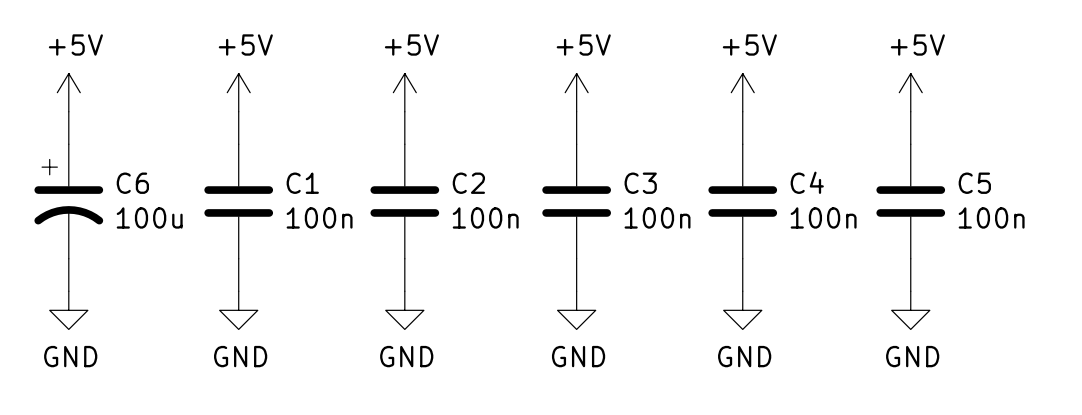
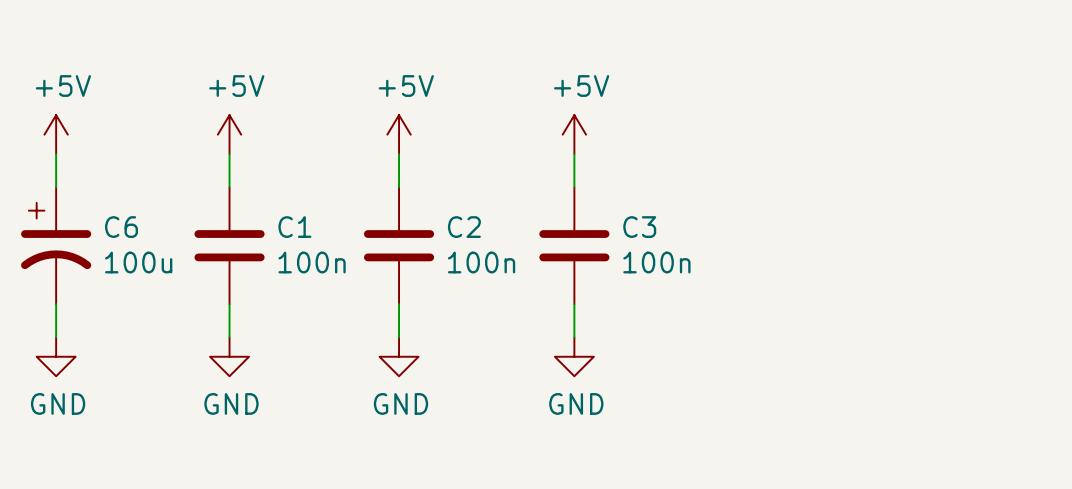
power symbol: +5V (742, 92) -> none
power symbol: +5V (910, 92) -> none
wire: (742, 111) (742, 144) -> none
wire: (910, 111) (910, 144) -> none
C4: 100n (742, 201) -> none
C5: 100n (910, 201) -> none
wire: (742, 258) (742, 291) -> none
wire: (910, 258) (910, 291) -> none
power symbol: GND (742, 310) -> none
power symbol: GND (910, 310) -> none

